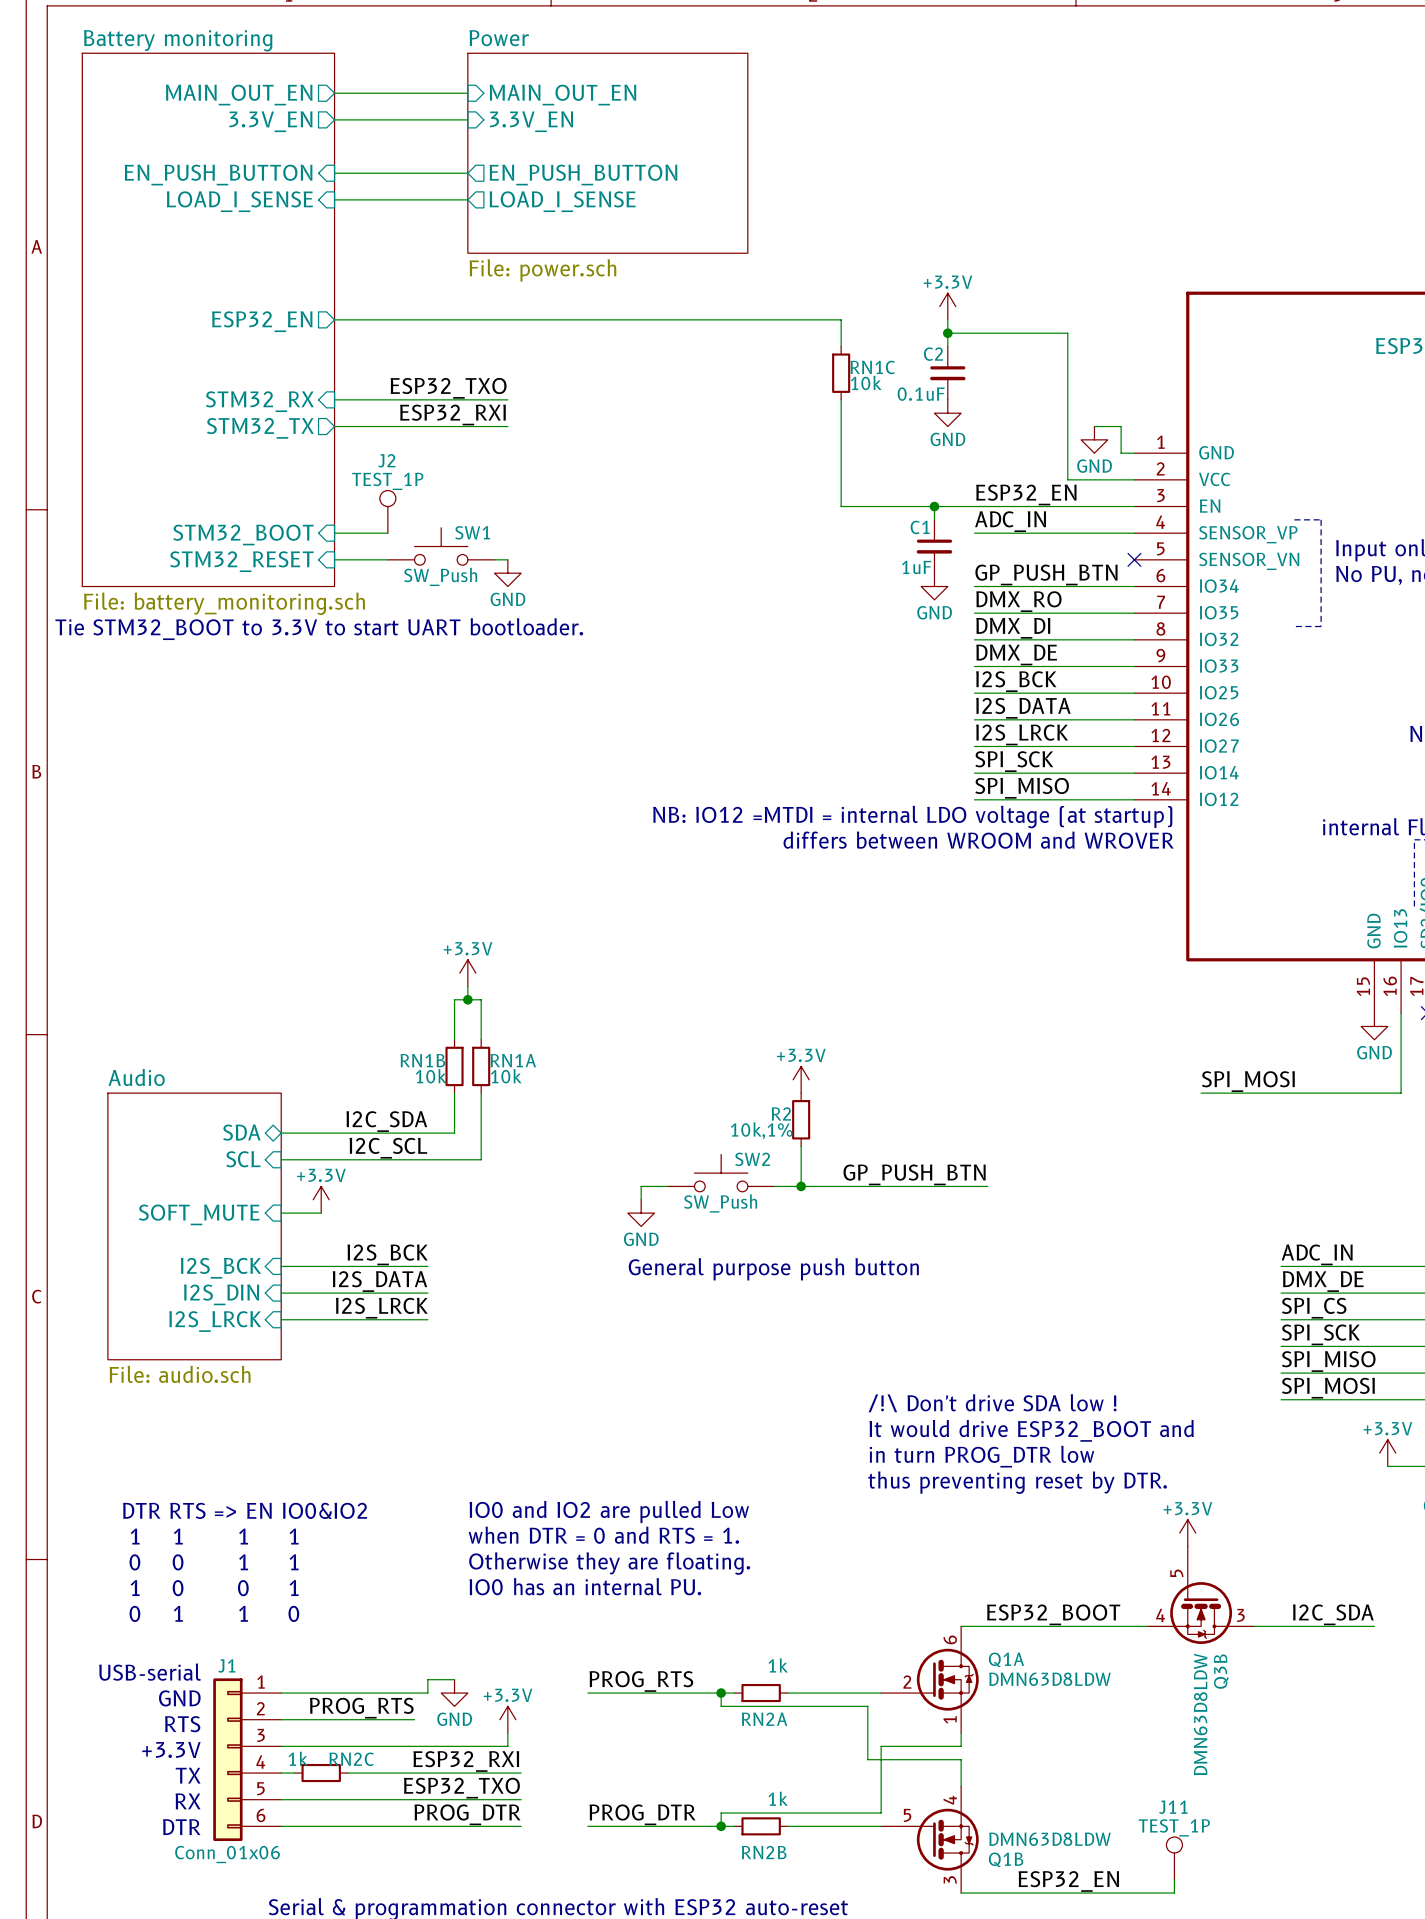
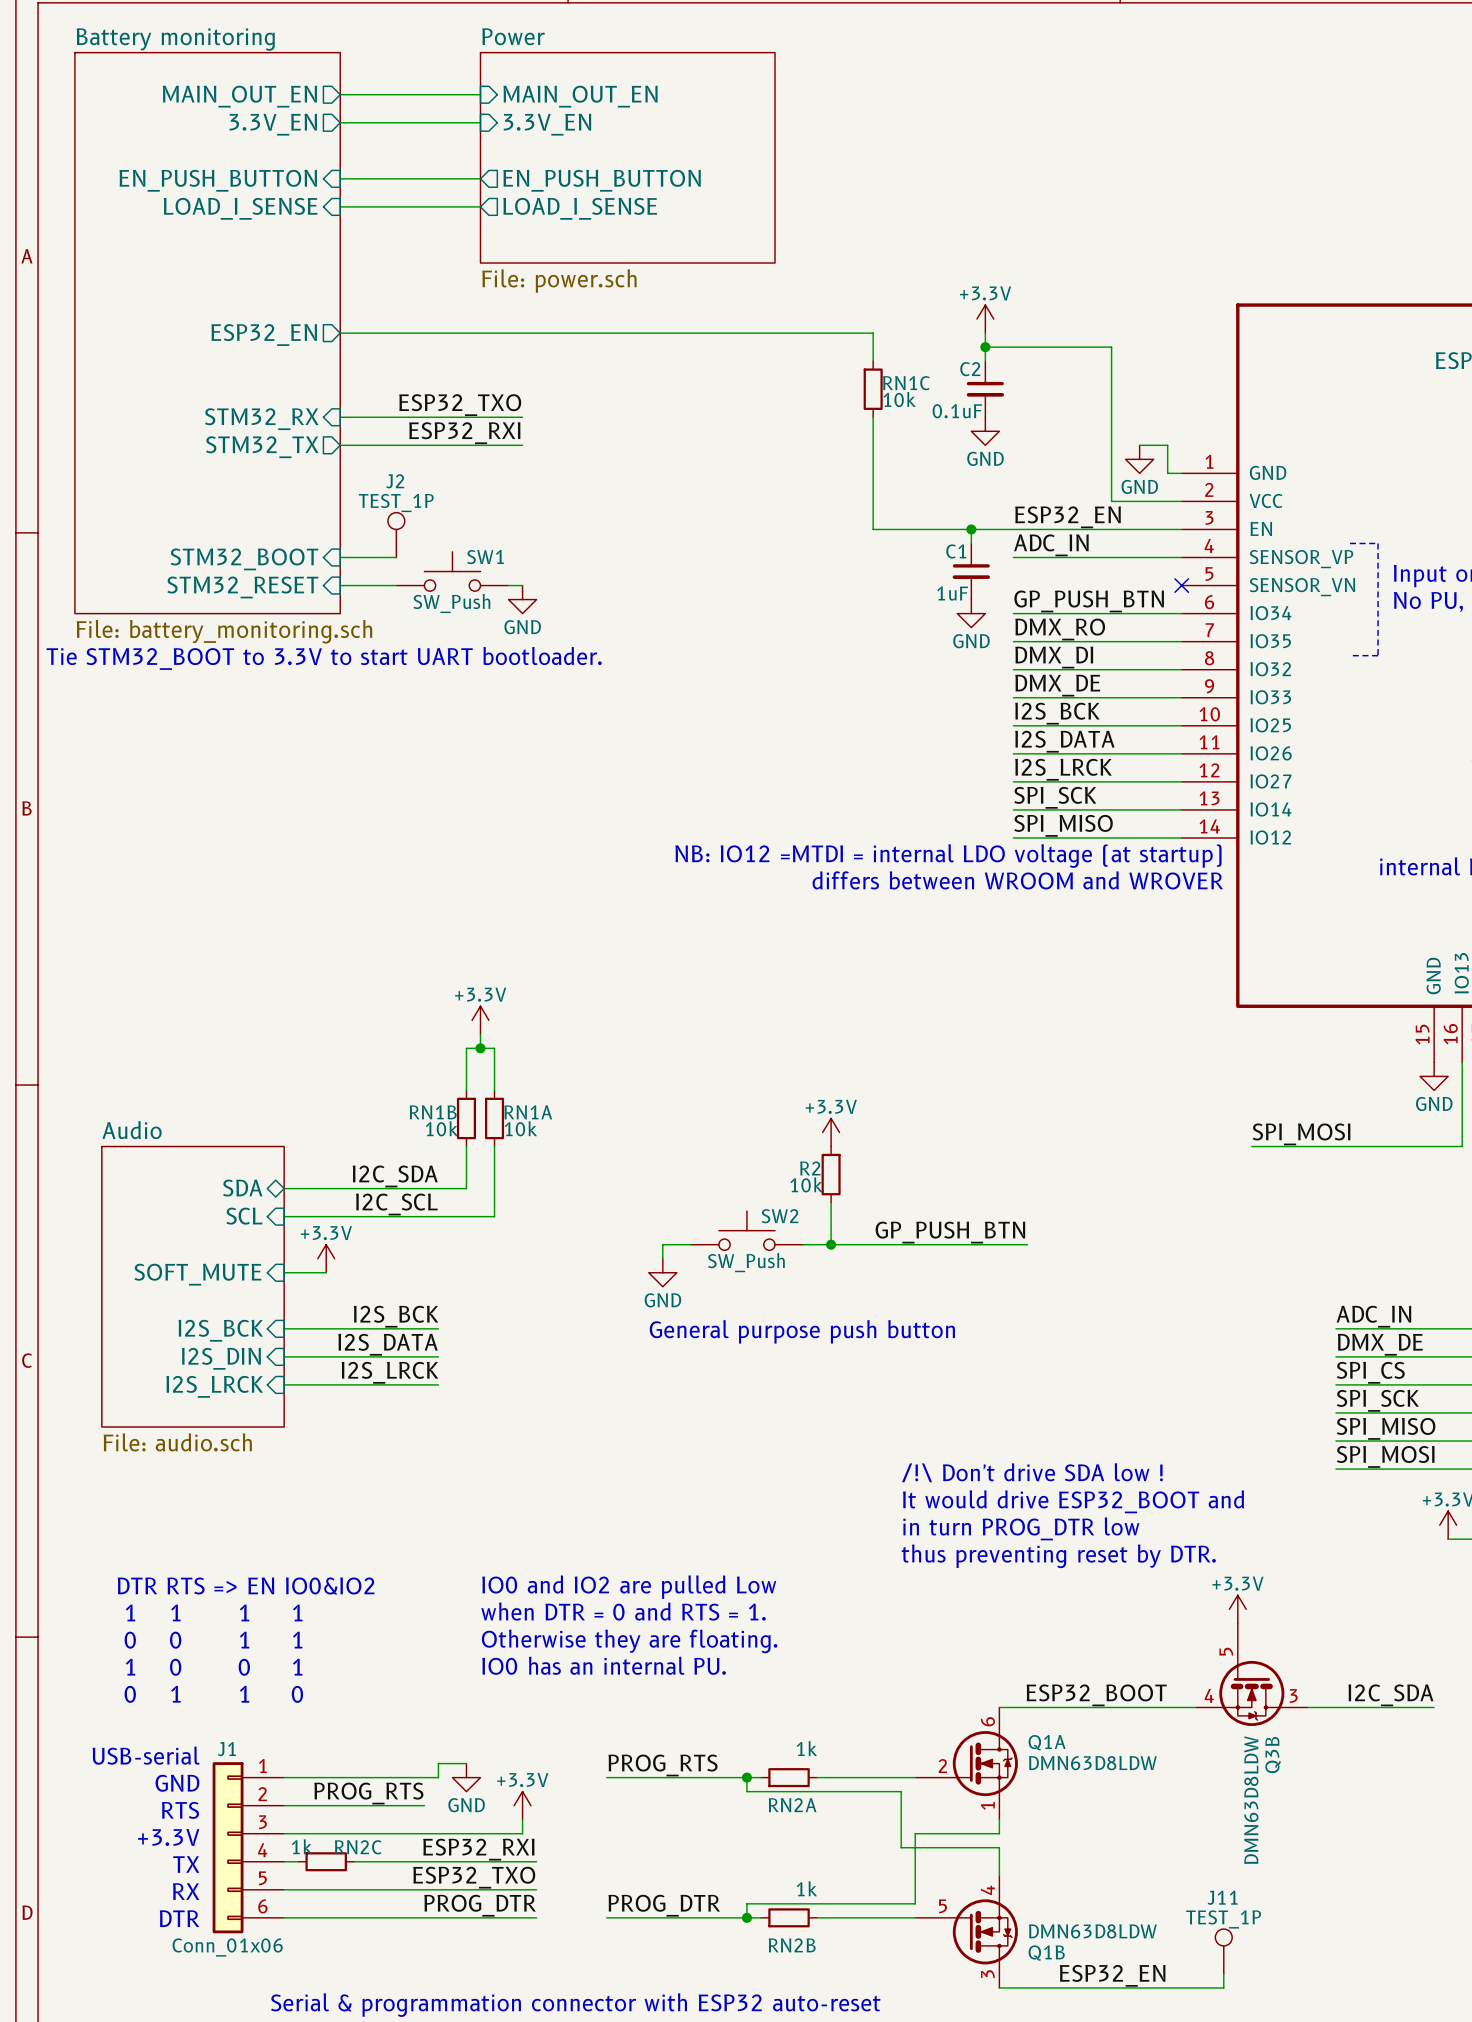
R2 value: 10k,1% (761, 1130) -> 10k (806, 1184)

